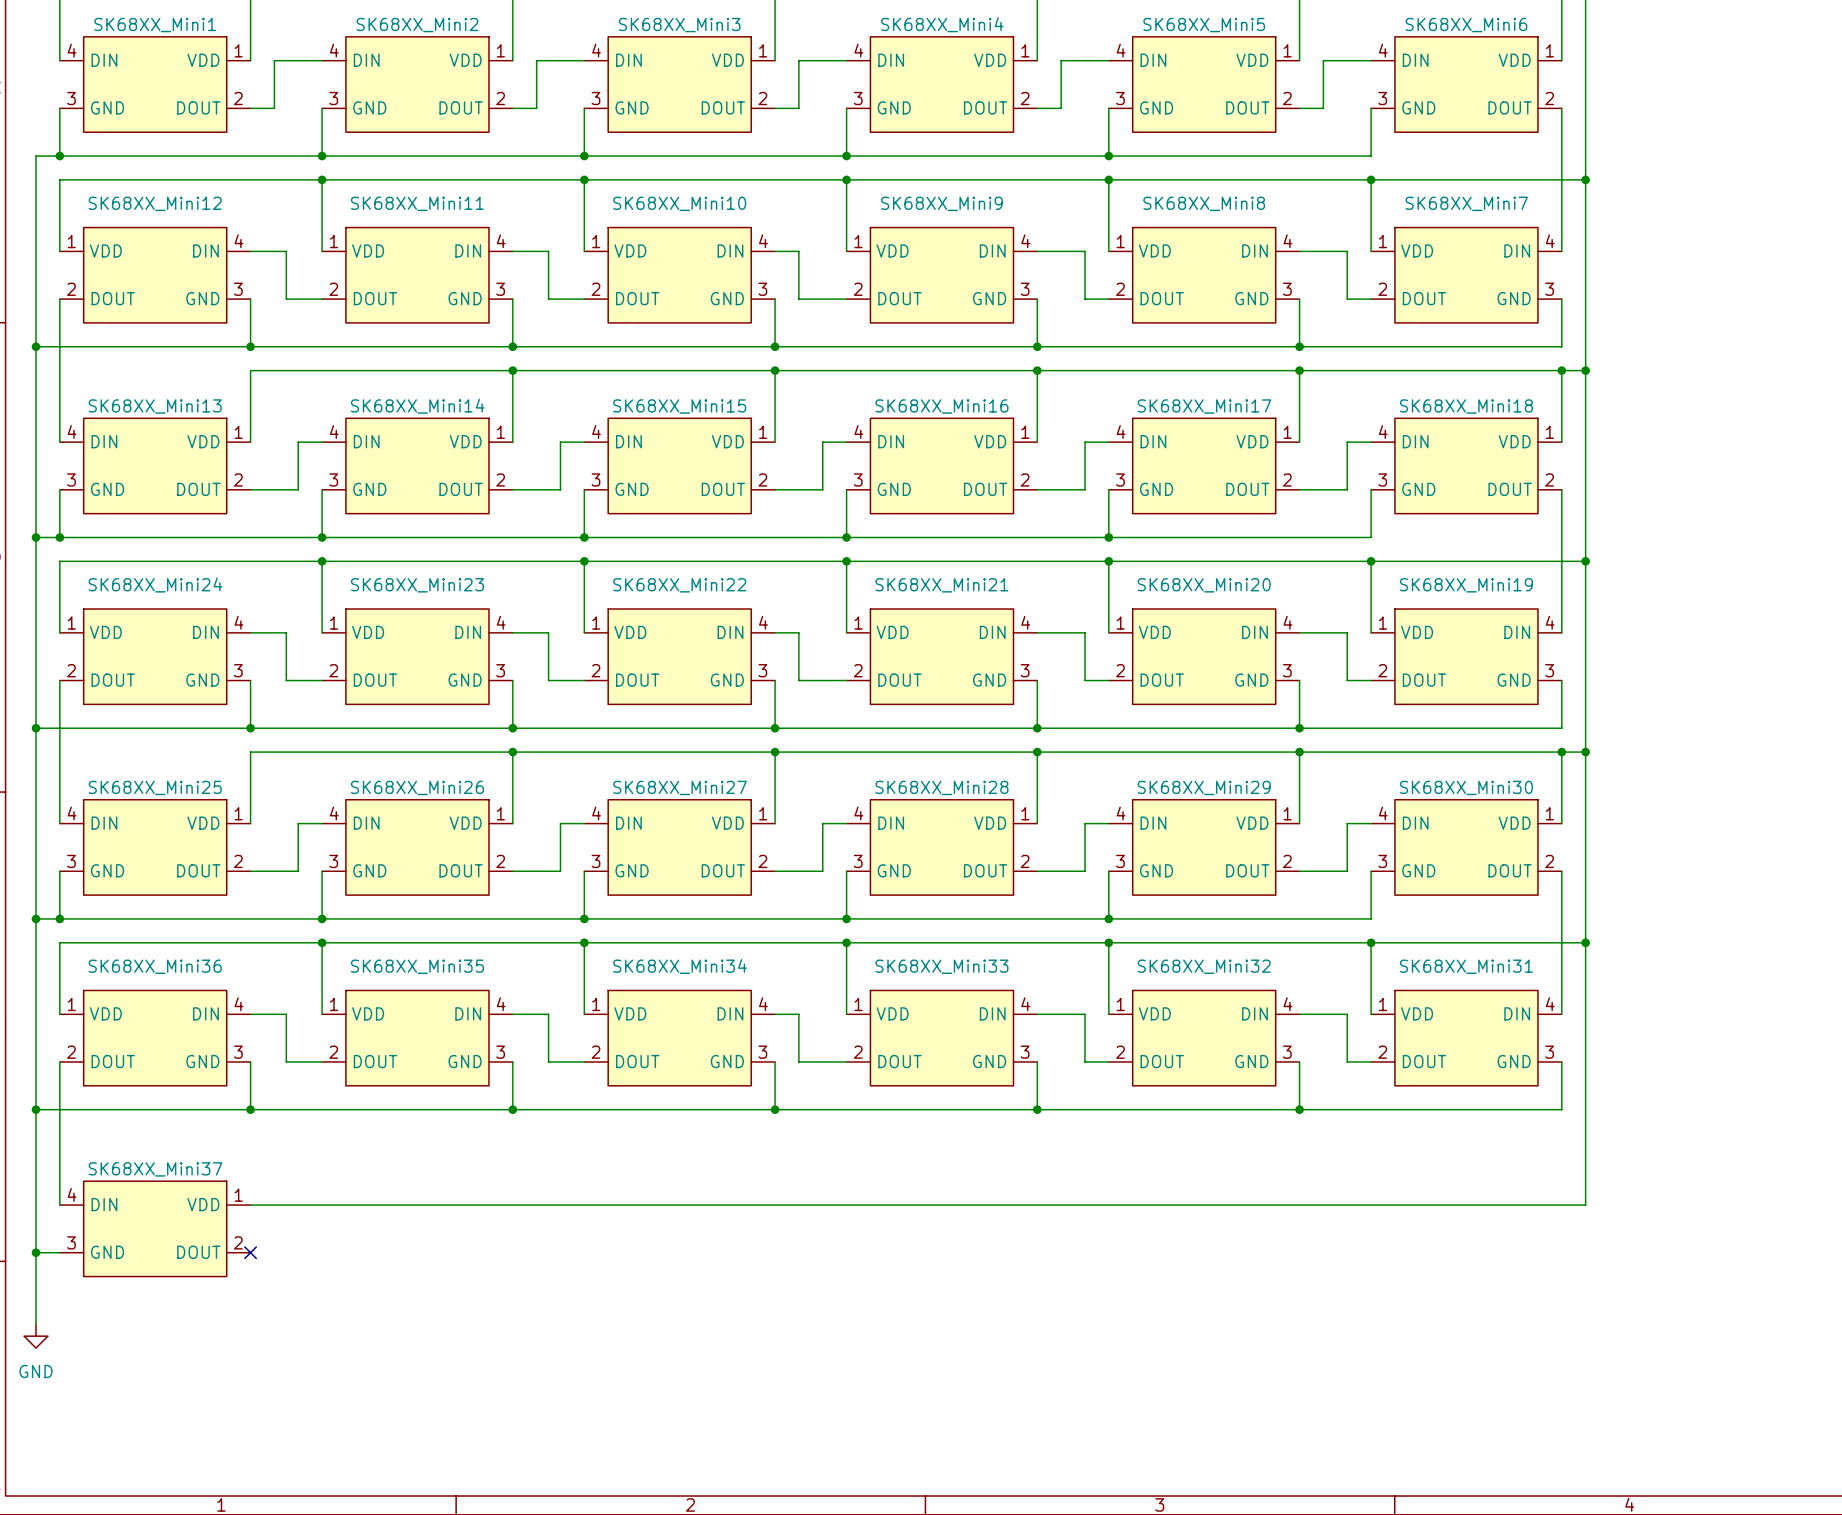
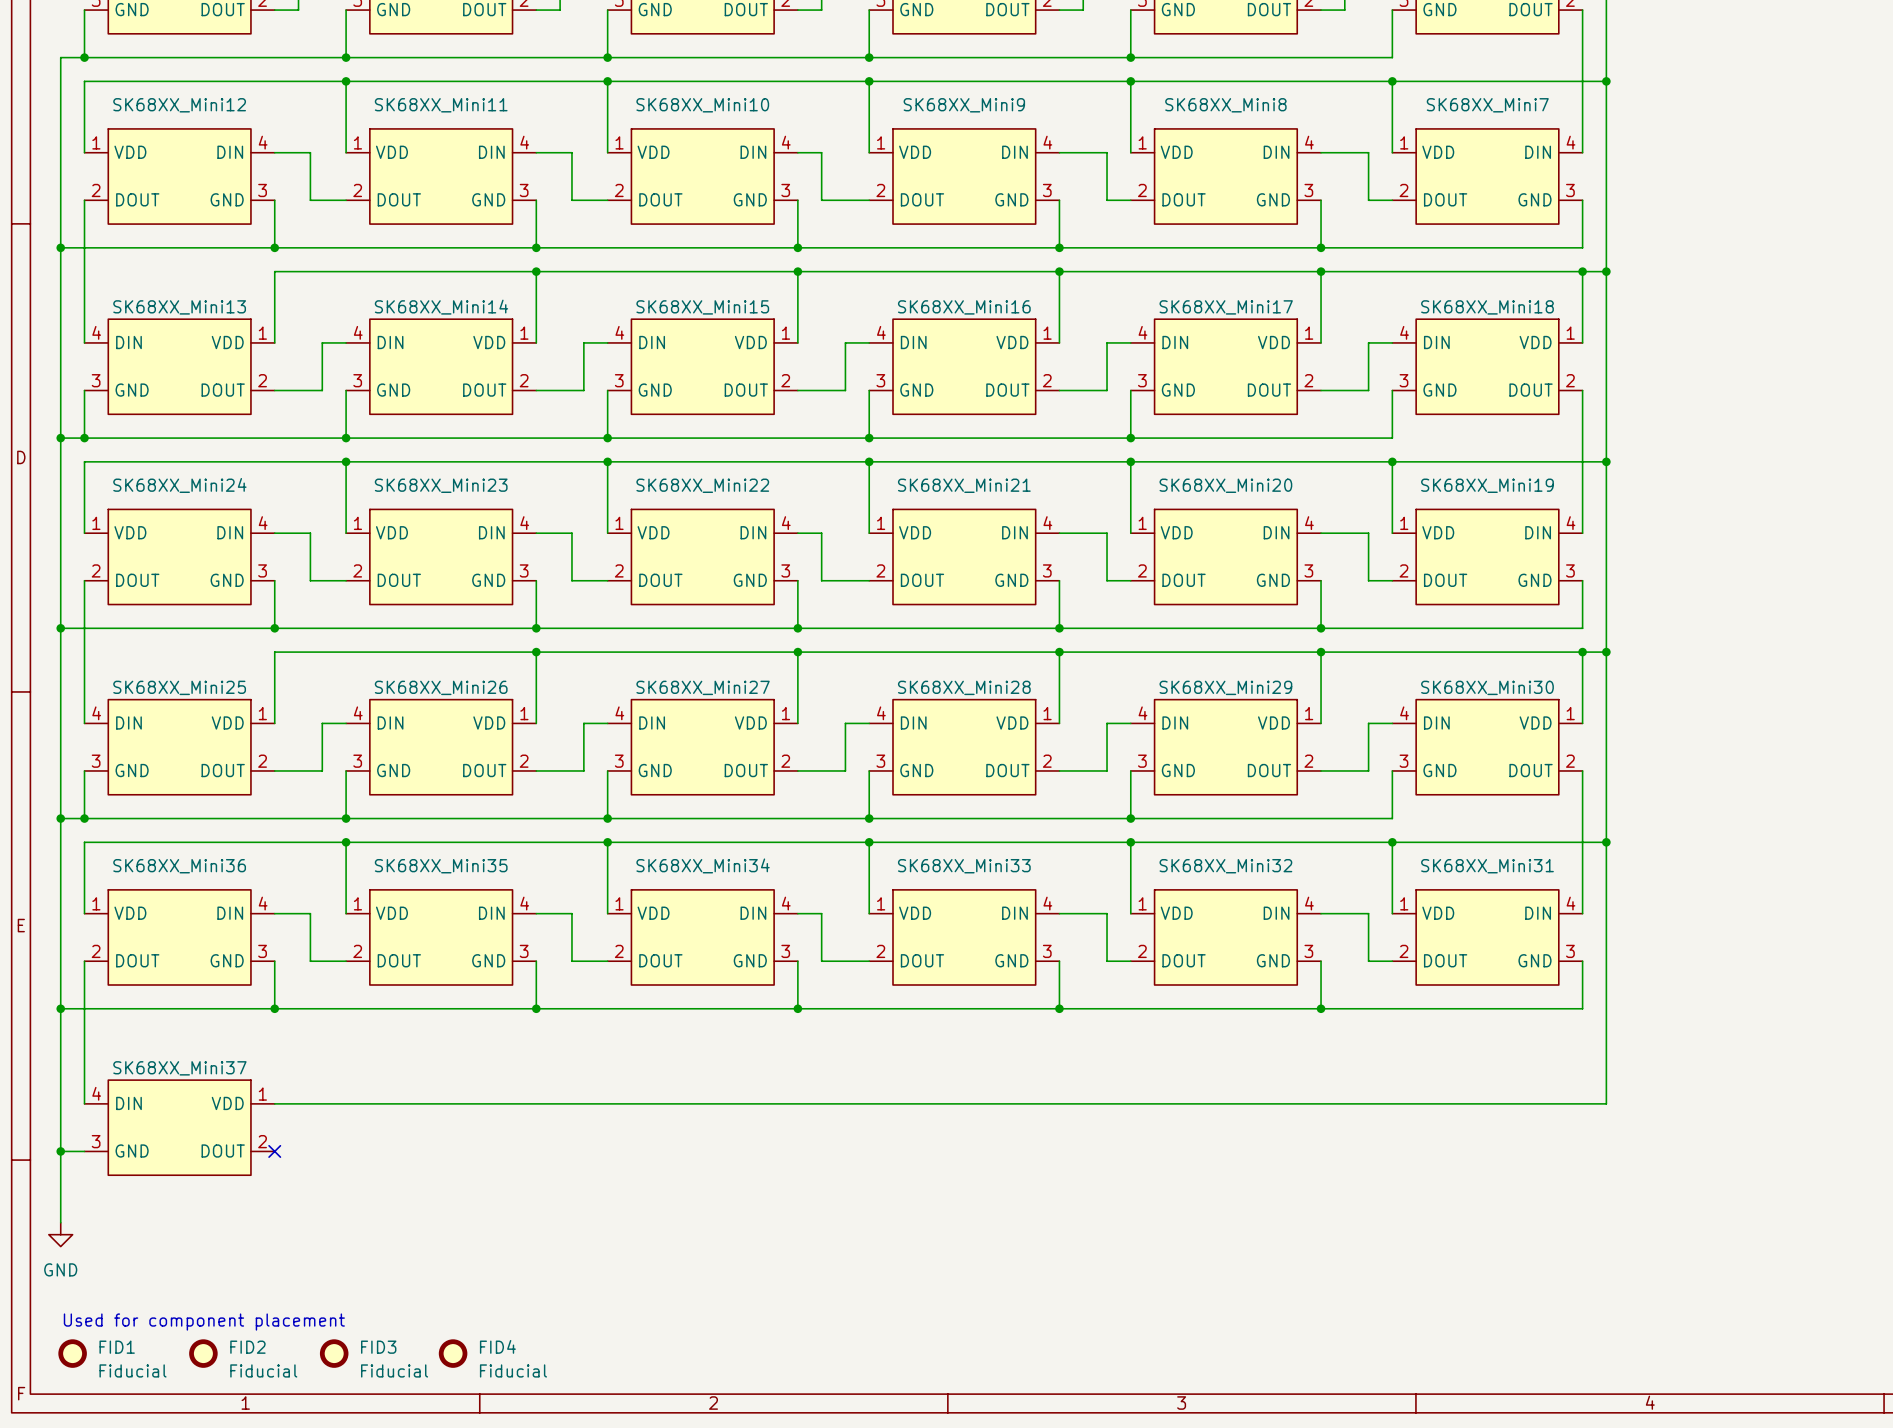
text: none -> Used for component placement (204, 1322)
FID1: none -> Fiducial (72, 1353)
FID2: none -> Fiducial (203, 1353)
FID3: none -> Fiducial (334, 1353)
FID4: none -> Fiducial (453, 1353)

